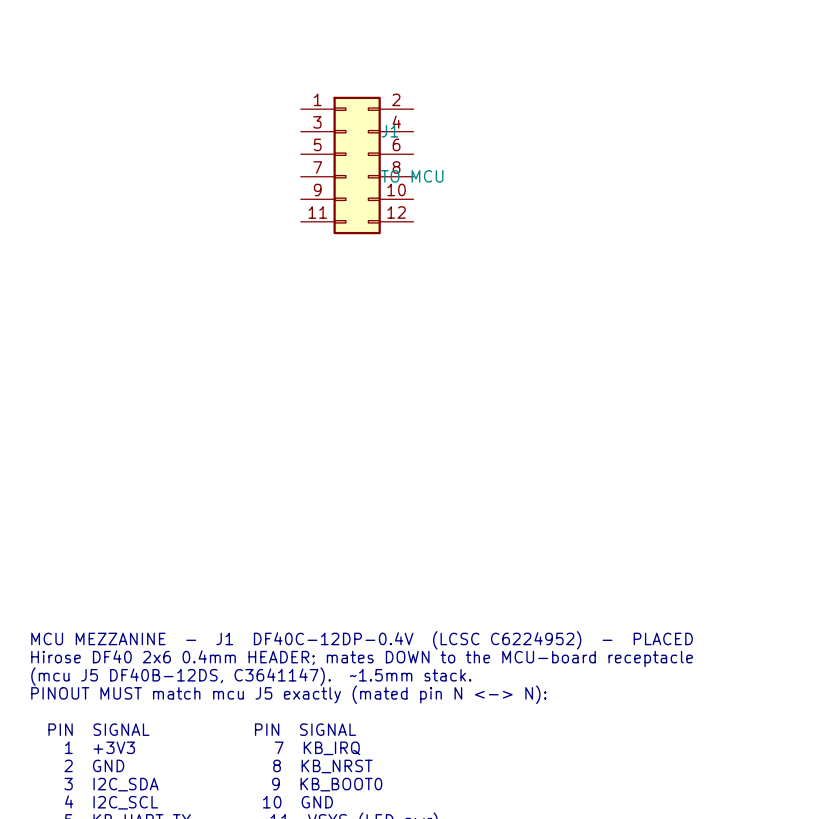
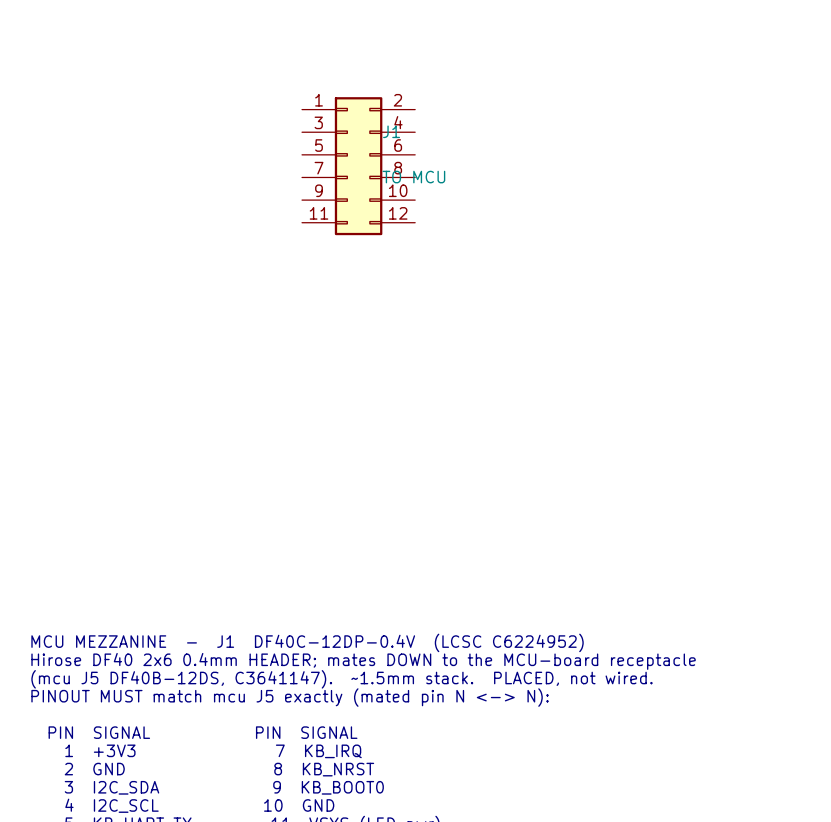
text: MCU MEZZANINE - J1 DF40C-12DP-0.4V (LCSC C6224952) - PLACED (362, 640) -> MCU MEZZANINE - J1 DF40C-12DP-0.4V (LCSC C6224952) (307, 642)
text: (mcu J5 DF40B-12DS, C3641147). ~1.5mm stack. (251, 676) -> (mcu J5 DF40B-12DS, C3641147). ~1.5mm stack. PLACED, not wired. (342, 679)

